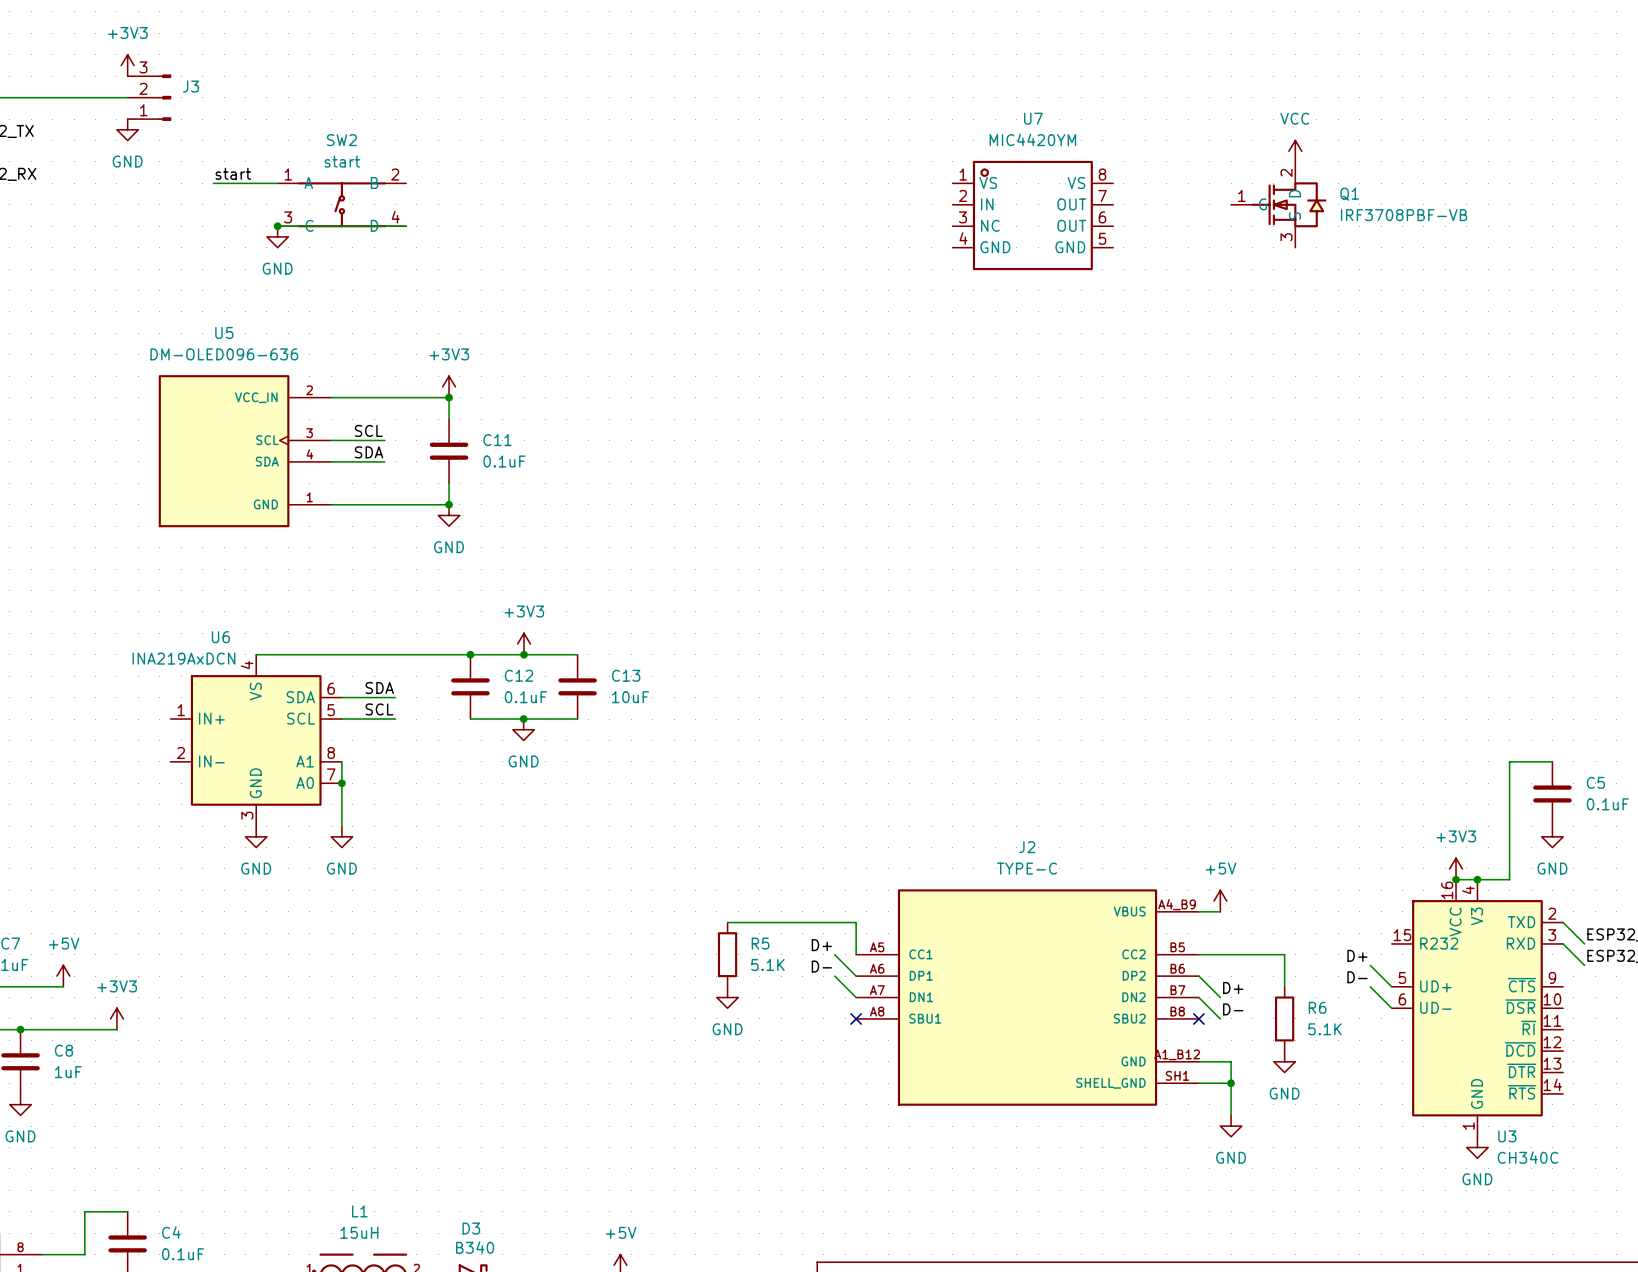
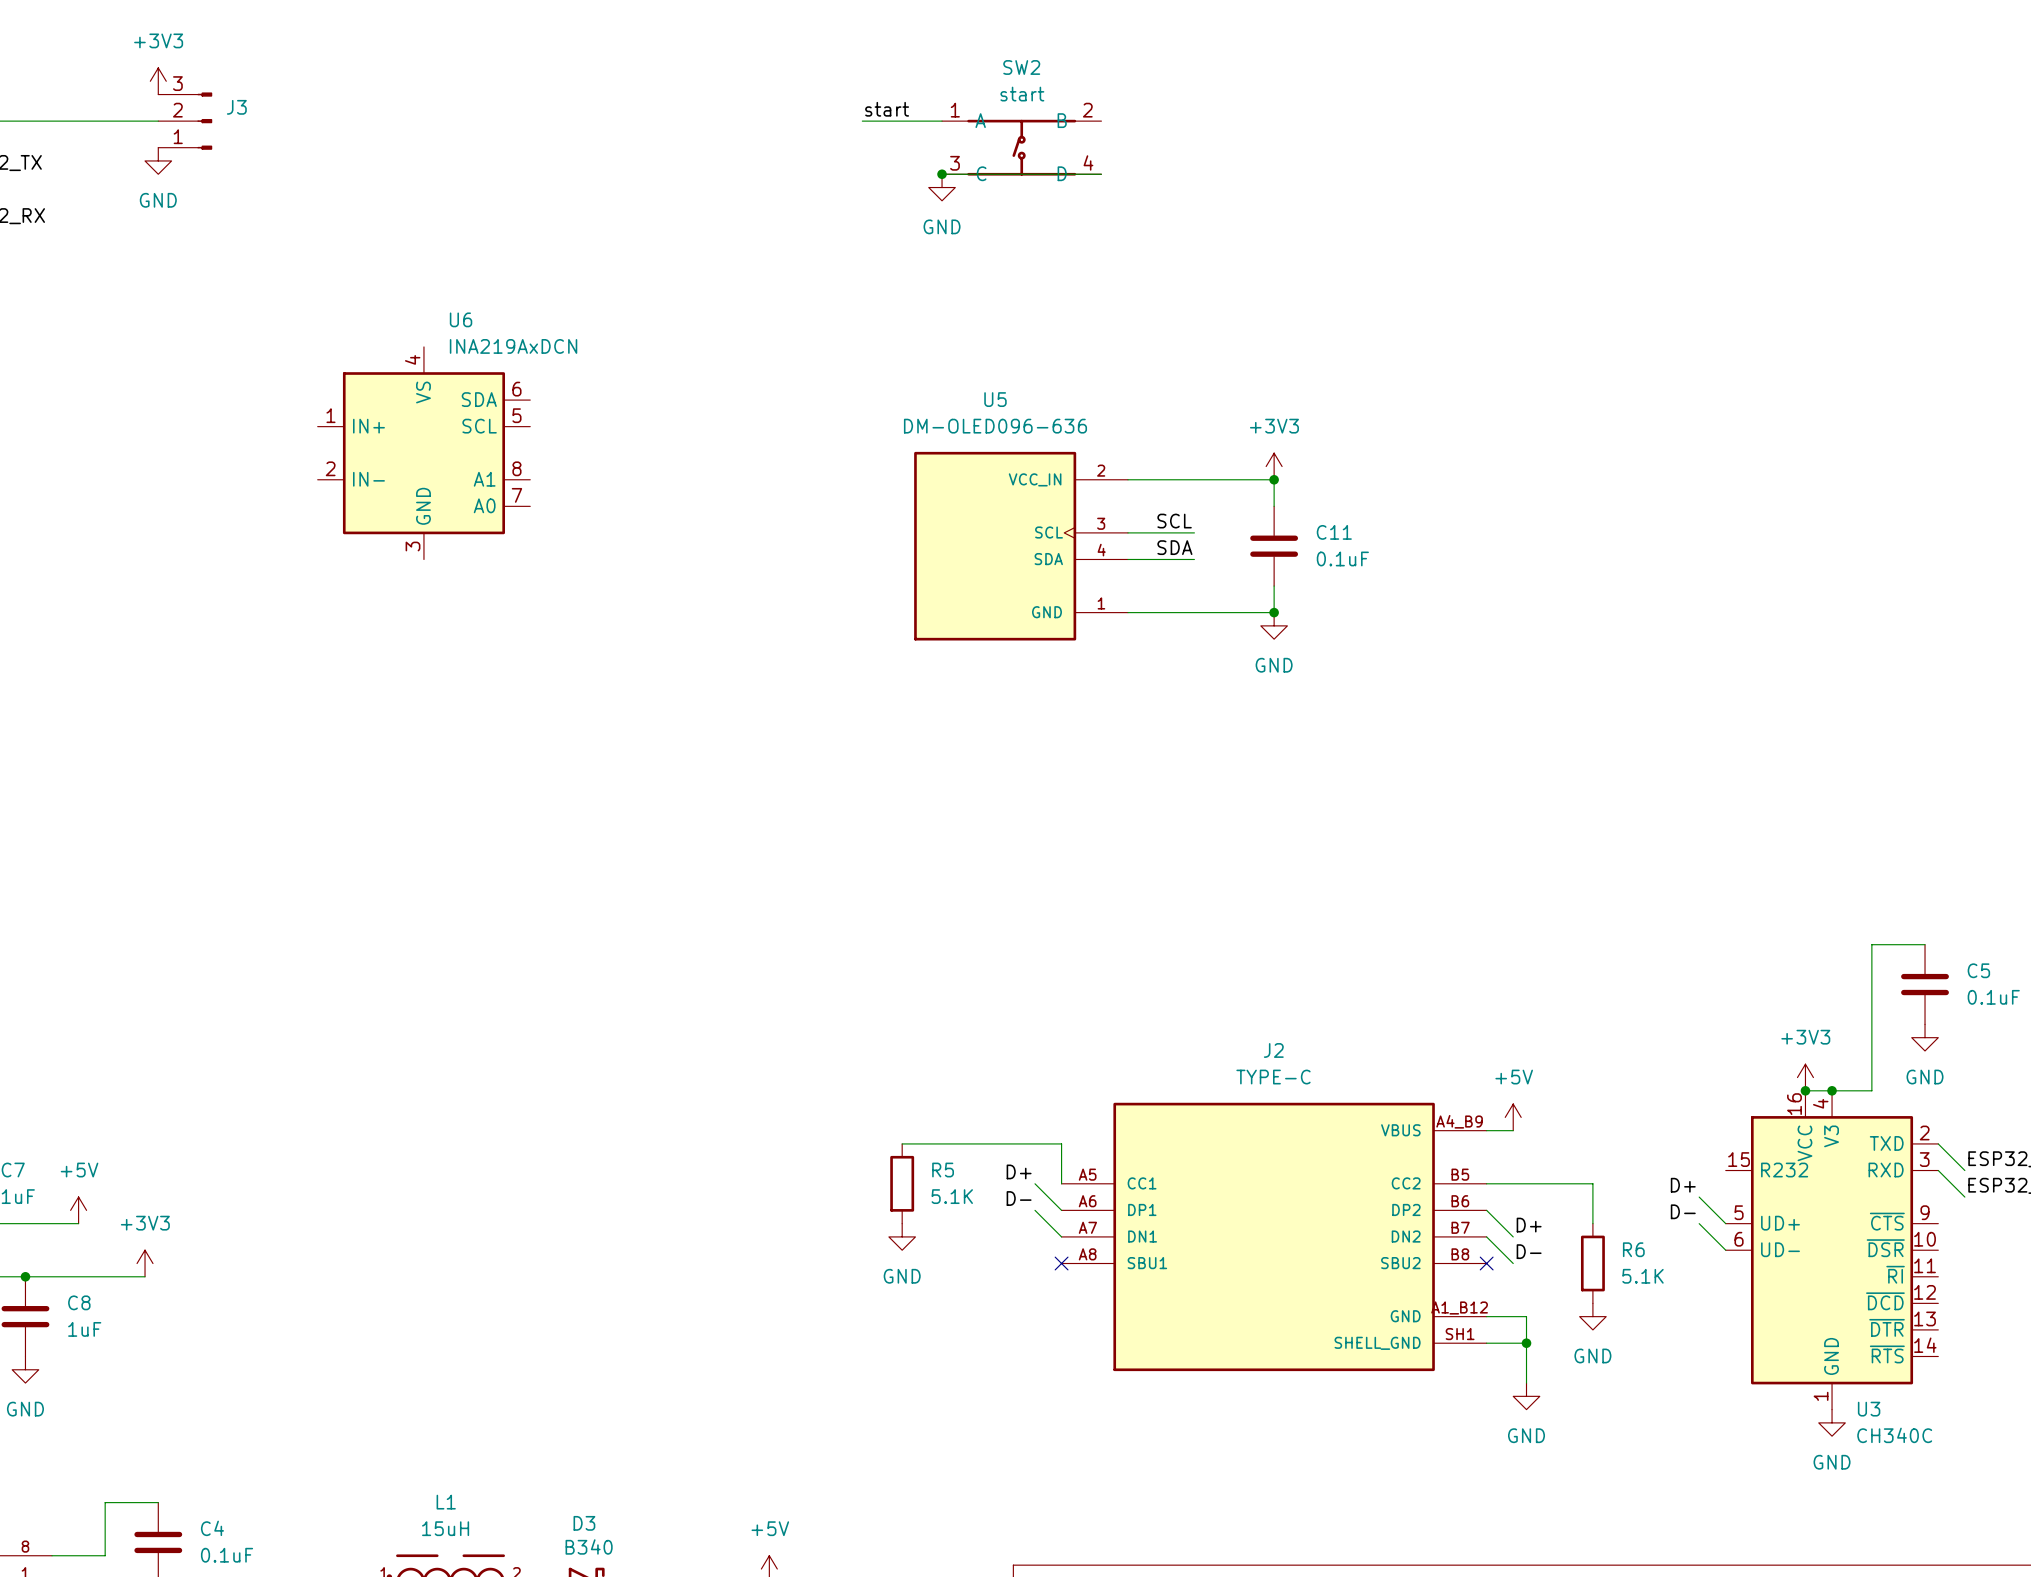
label: none -> start (887, 109)
wire: none -> (862, 121) (942, 121)
wire: none -> (942, 174) (1101, 174)
junction: none -> (942, 174)
power symbol: none -> GND (942, 187)
power symbol: VCC (1295, 151) -> none
label: start (233, 173) -> none
wire: (213, 183) (277, 183) -> none
SW2 position: (341, 204) -> (1021, 147)
Q1: IRF3708PBF-VB (1278, 204) -> none
U7: MIC4420YM (1032, 215) -> none
wire: (277, 226) (406, 226) -> none
junction: (277, 226) -> none
power symbol: GND (277, 236) -> none
power symbol: none -> +3V3 (1274, 466)
power symbol: +3V3 (449, 386) -> none
wire: none -> (1128, 479) (1274, 479) (1274, 506)
junction: none -> (1274, 479)
wire: (331, 397) (449, 397) (449, 419) -> none
junction: (449, 397) -> none
label: none -> SCL (1174, 521)
wire: none -> (1128, 532) (1194, 532)
label: SCL (368, 430) -> none
wire: (331, 440) (384, 440) -> none
label: none -> SDA (1174, 547)
U5 position: (244, 451) -> (1021, 546)
C11 position: (449, 451) -> (1274, 546)
wire: none -> (1128, 559) (1194, 559)
label: SDA (369, 452) -> none
wire: (331, 461) (384, 461) -> none
wire: none -> (1274, 586) (1274, 612) (1128, 612)
wire: (449, 483) (449, 504) (331, 504) -> none
junction: none -> (1274, 612)
junction: (449, 504) -> none
power symbol: none -> GND (1274, 625)
power symbol: GND (449, 515) -> none
U6 name position: U6 (220, 637) -> U6 (461, 319)
power symbol: +3V3 (524, 644) -> none
wire: (256, 654) (577, 654) -> none
junction: (470, 654) -> none
junction: (524, 654) -> none
U6 value position: INA219AxDCN (183, 658) -> INA219AxDCN (513, 346)
C12: 0.1uF (470, 686) -> none
C13: 10uF (577, 686) -> none
label: SDA (379, 688) -> none
wire: (341, 697) (395, 697) -> none
label: SCL (379, 709) -> none
wire: (341, 719) (395, 719) -> none
wire: (470, 719) (577, 719) -> none
junction: (523, 719) -> none
power symbol: GND (523, 729) -> none
U6 position: (256, 740) -> (423, 453)
wire: (341, 761) (341, 826) -> none
junction: (341, 783) -> none
power symbol: GND (256, 836) -> none
power symbol: GND (341, 836) -> none

